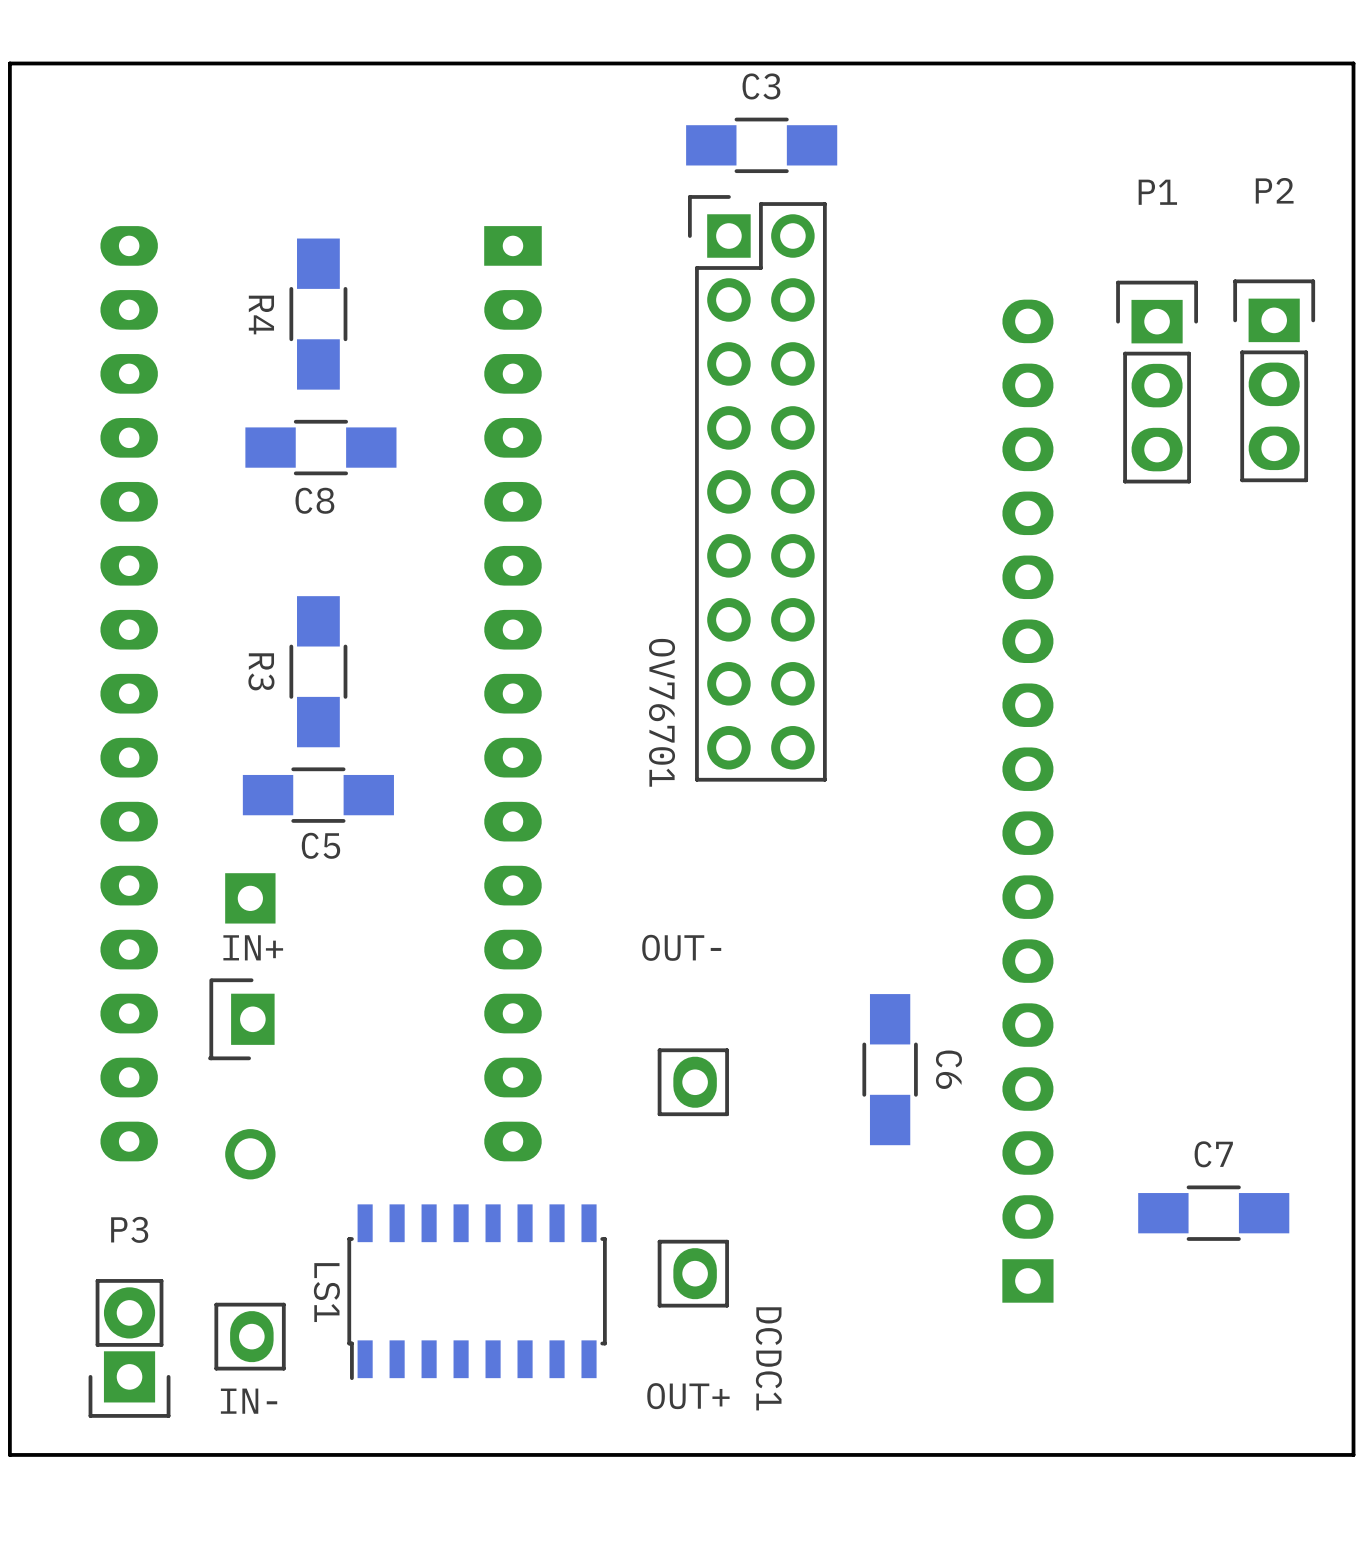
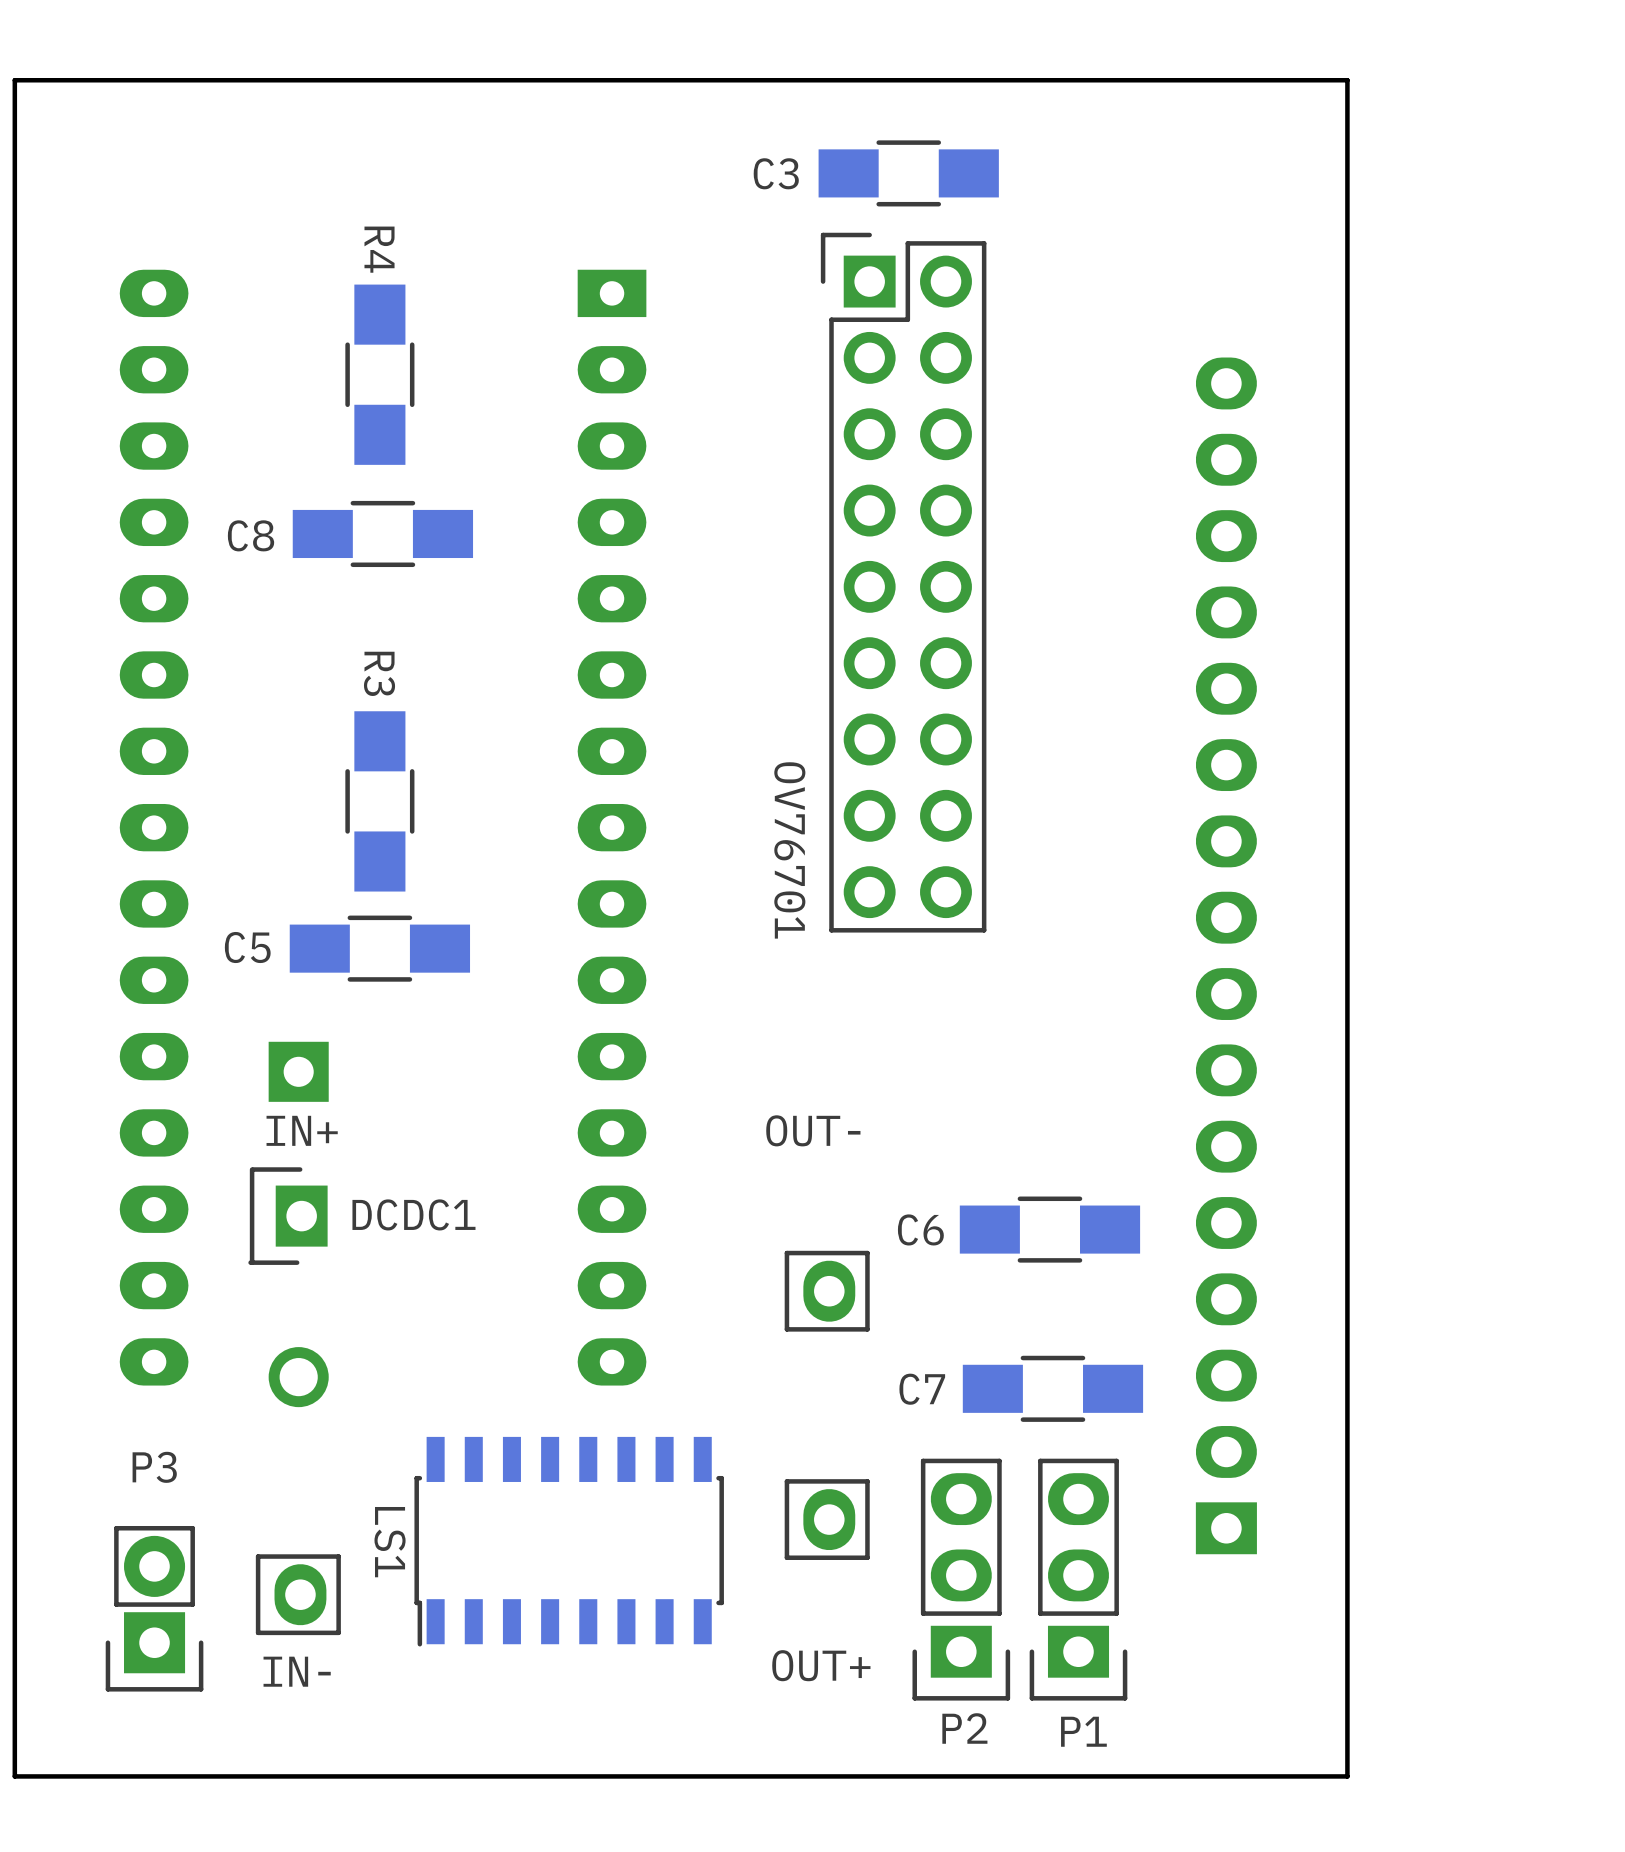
board edge: (1353, 63) (9, 63) (9, 1454) (1353, 1454) (1353, 63) -> (1347, 80) (1347, 1776) (14, 1776) (14, 80) (1347, 80)
C3 name position: C3 (761, 86) -> C3 (776, 173)
P2 name position: P2 (1274, 190) -> P2 (964, 1728)
P1 name position: P1 (1157, 192) -> P1 (1083, 1731)
R4 name position: R4 (261, 315) -> R4 (379, 249)
P2 rotation: 0° (1274, 380) -> 180° (961, 1579)
P2 position: (1274, 380) -> (961, 1579)
P1 rotation: 0° (1157, 382) -> 180° (1078, 1579)
P1 position: (1157, 382) -> (1078, 1579)
C8 name position: C8 (314, 500) -> C8 (251, 535)
R3 name position: R3 (261, 671) -> R3 (379, 673)
C5 name position: C5 (320, 845) -> C5 (247, 947)
C6 rotation: 0° (890, 1069) -> 90° clockwise (1049, 1229)
C6 name position: C6 (948, 1069) -> C6 (920, 1229)
C7 name position: C7 (1213, 1154) -> C7 (922, 1389)
C7 position: (1213, 1213) -> (1052, 1388)
DCDC1 name rotation: 0° (768, 1358) -> 90° counterclockwise (413, 1214)
DCDC1 name position: DCDC1 (768, 1358) -> DCDC1 (413, 1214)

